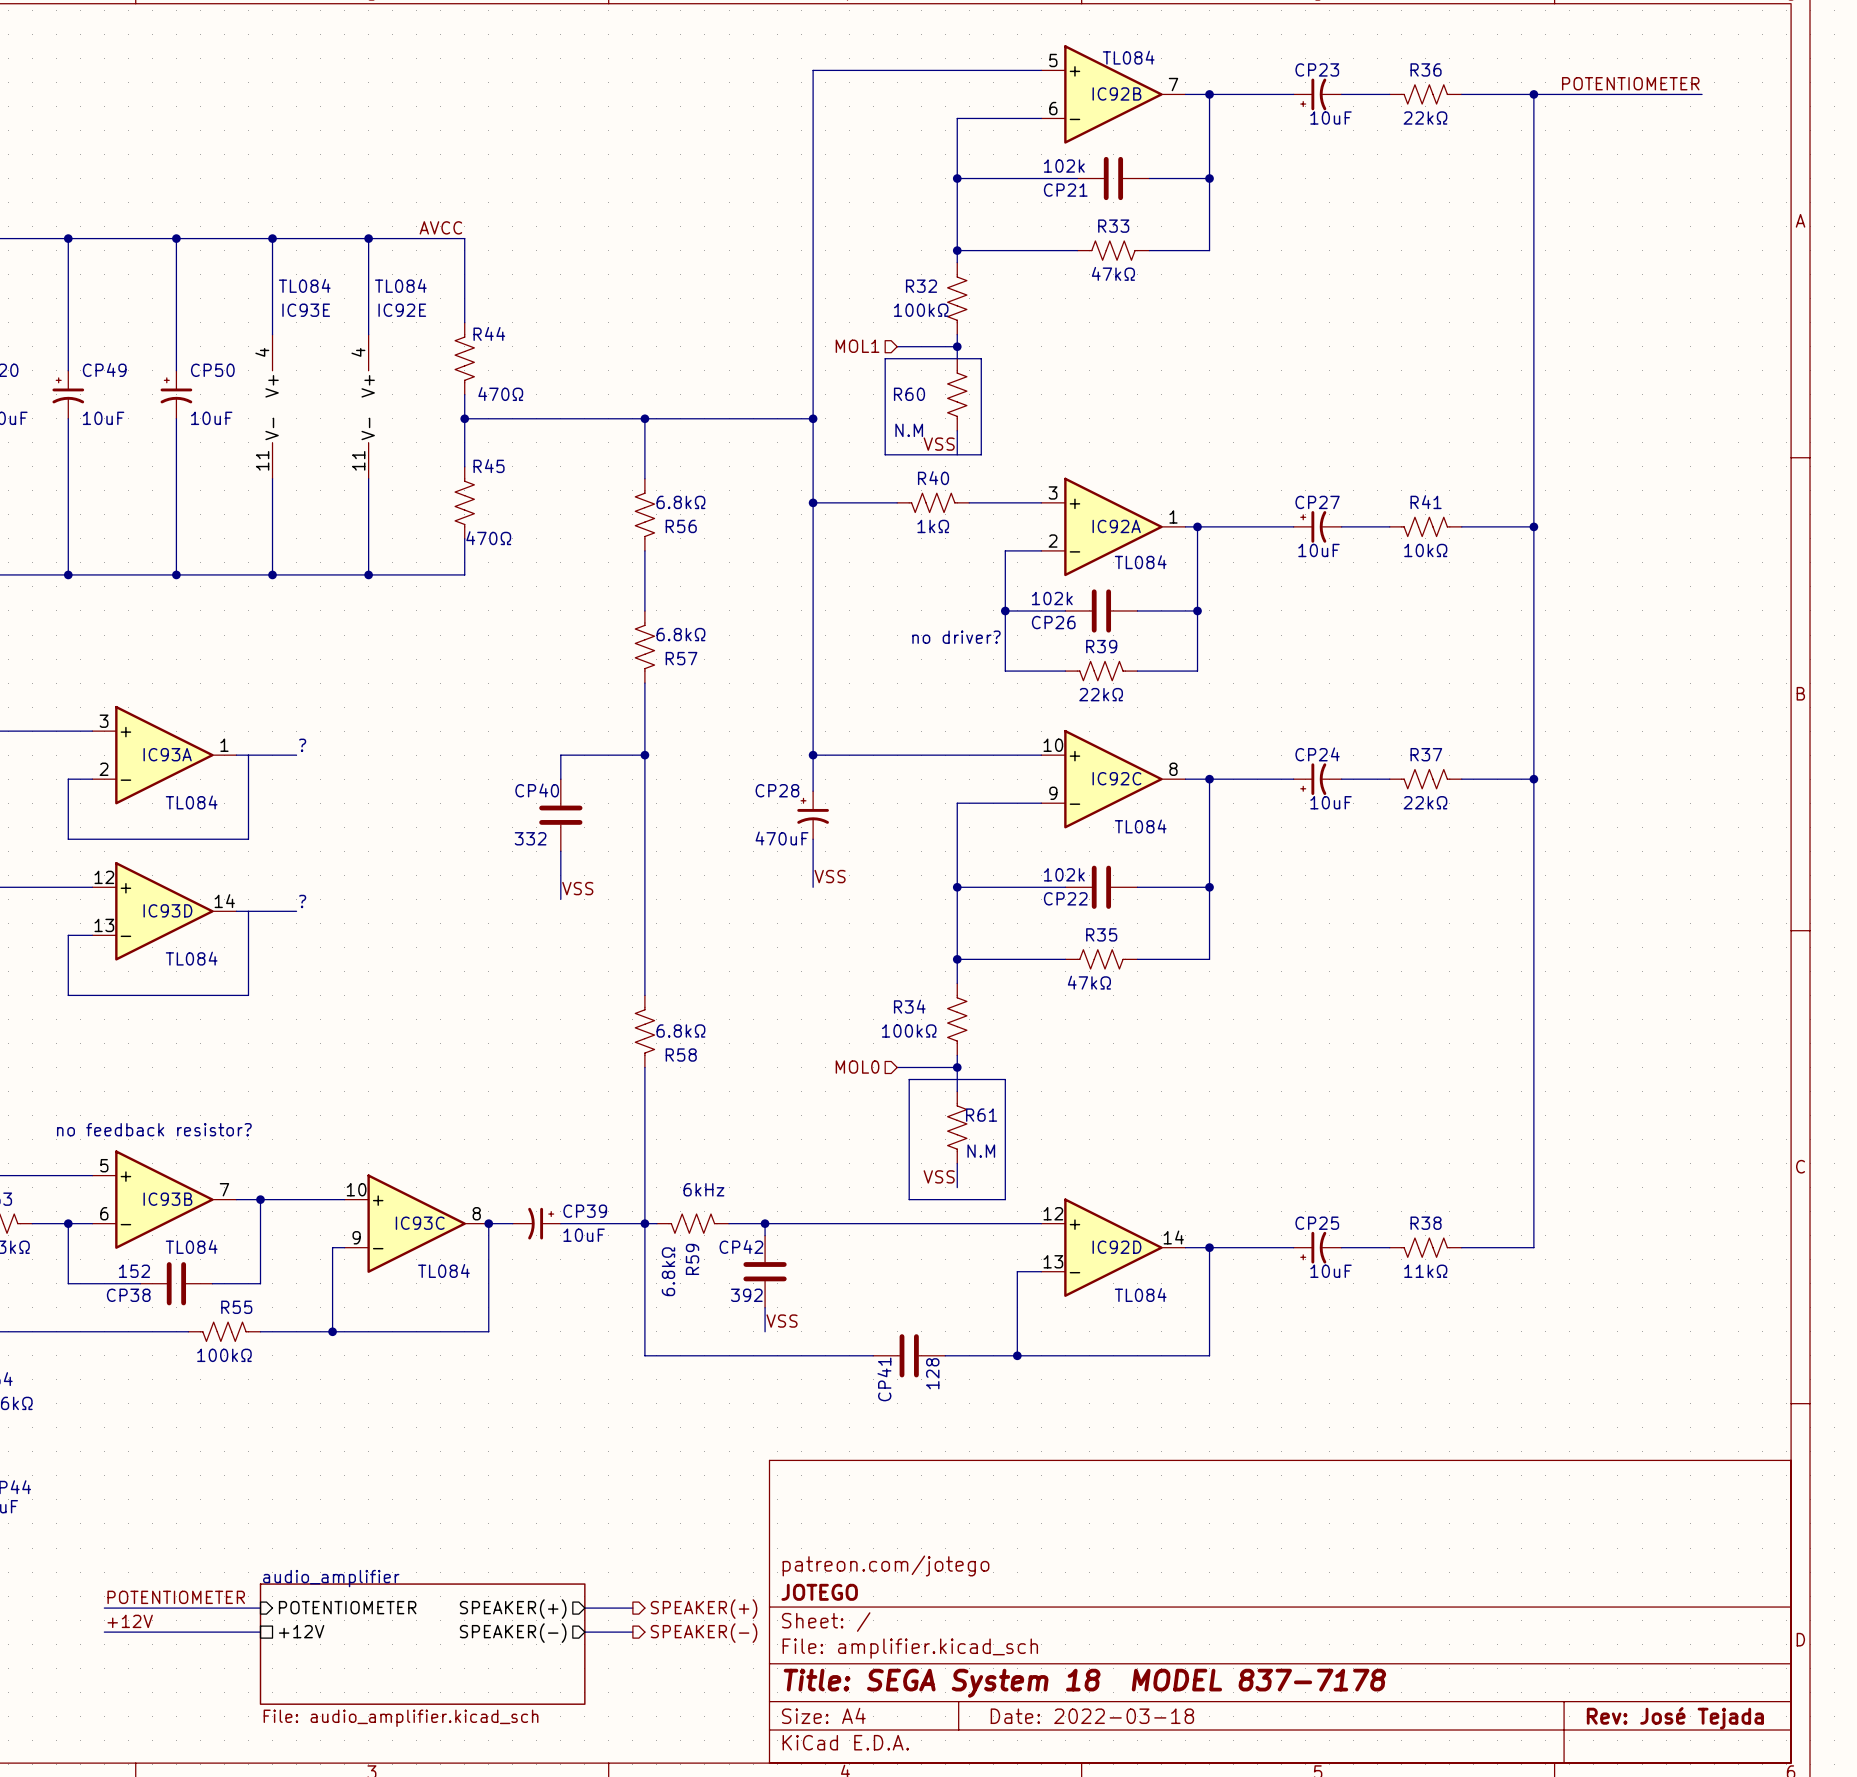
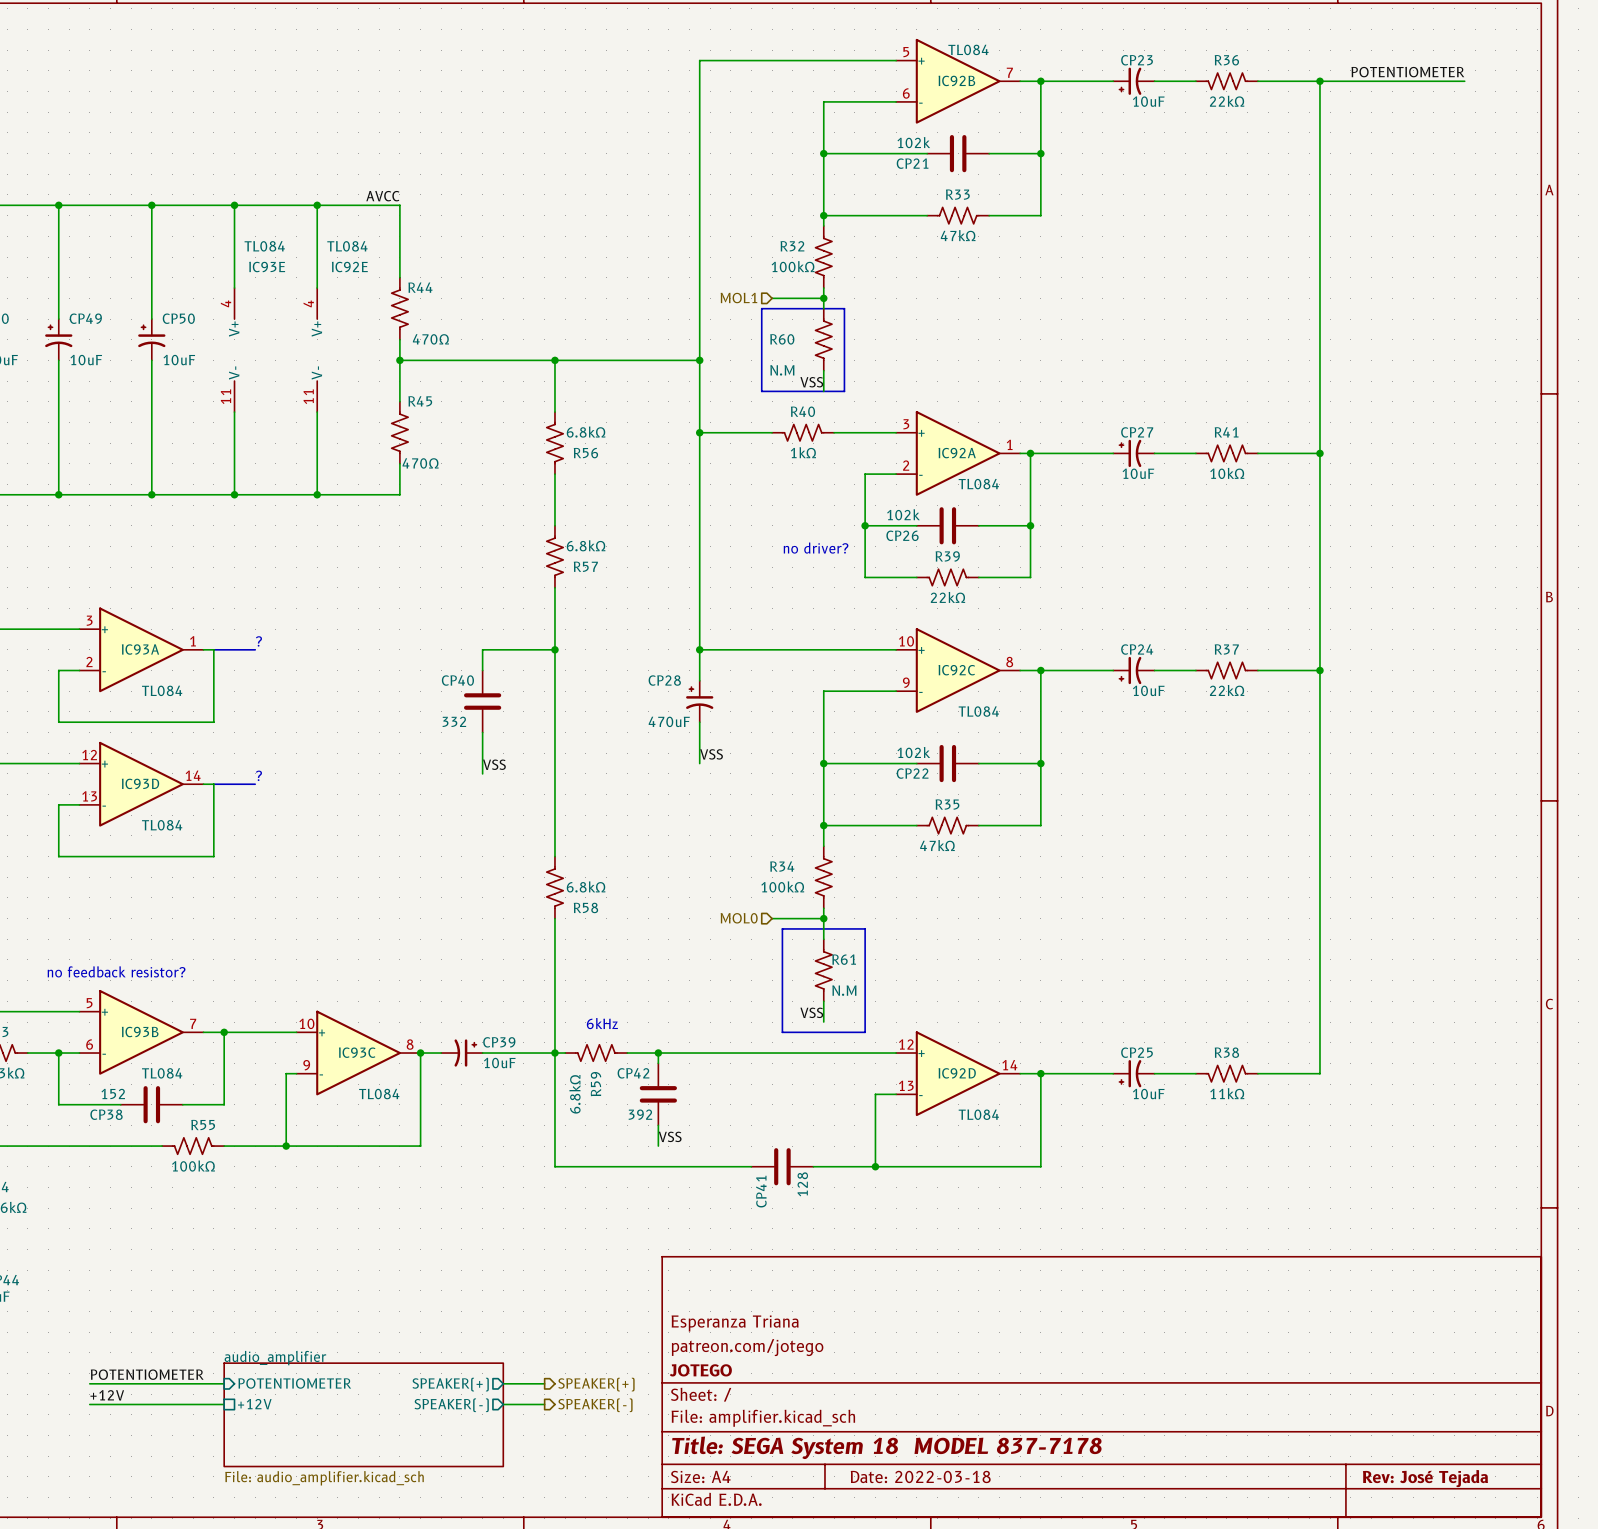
title block: none -> Esperanza Triana (735, 1323)

